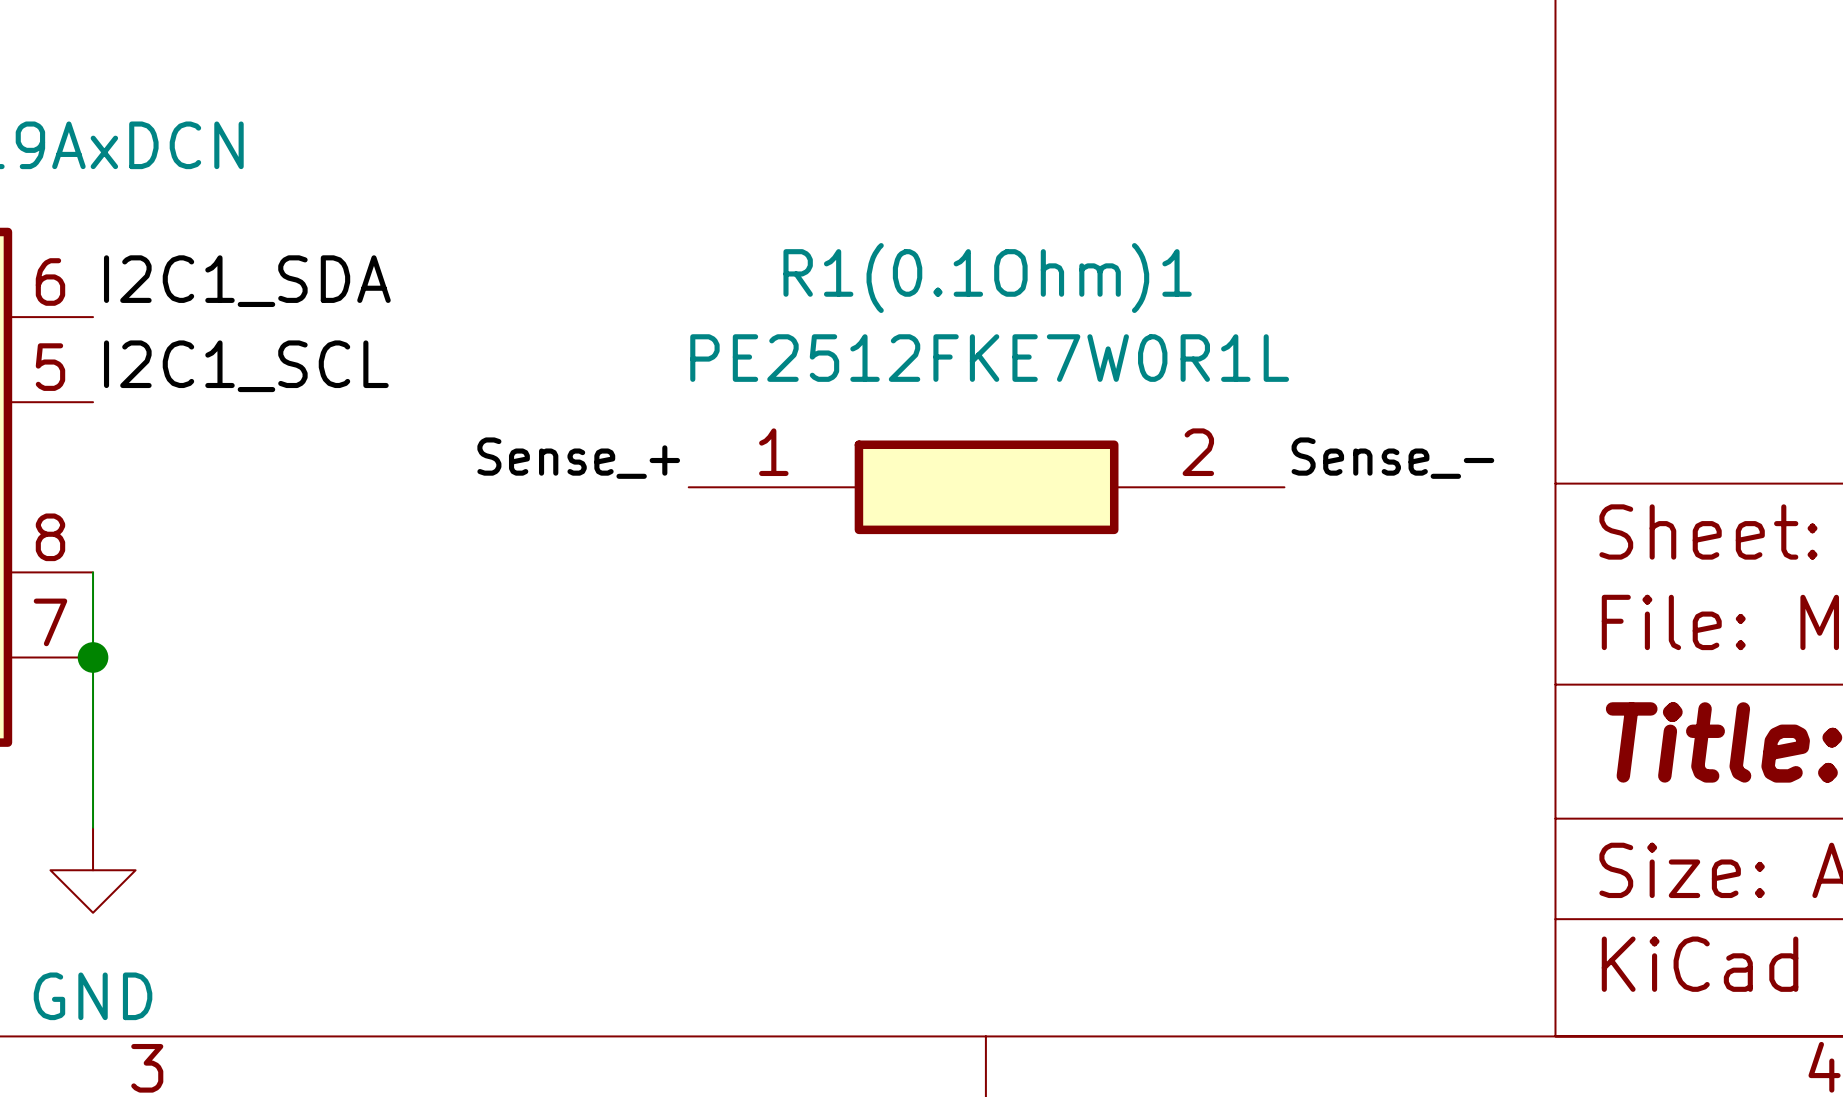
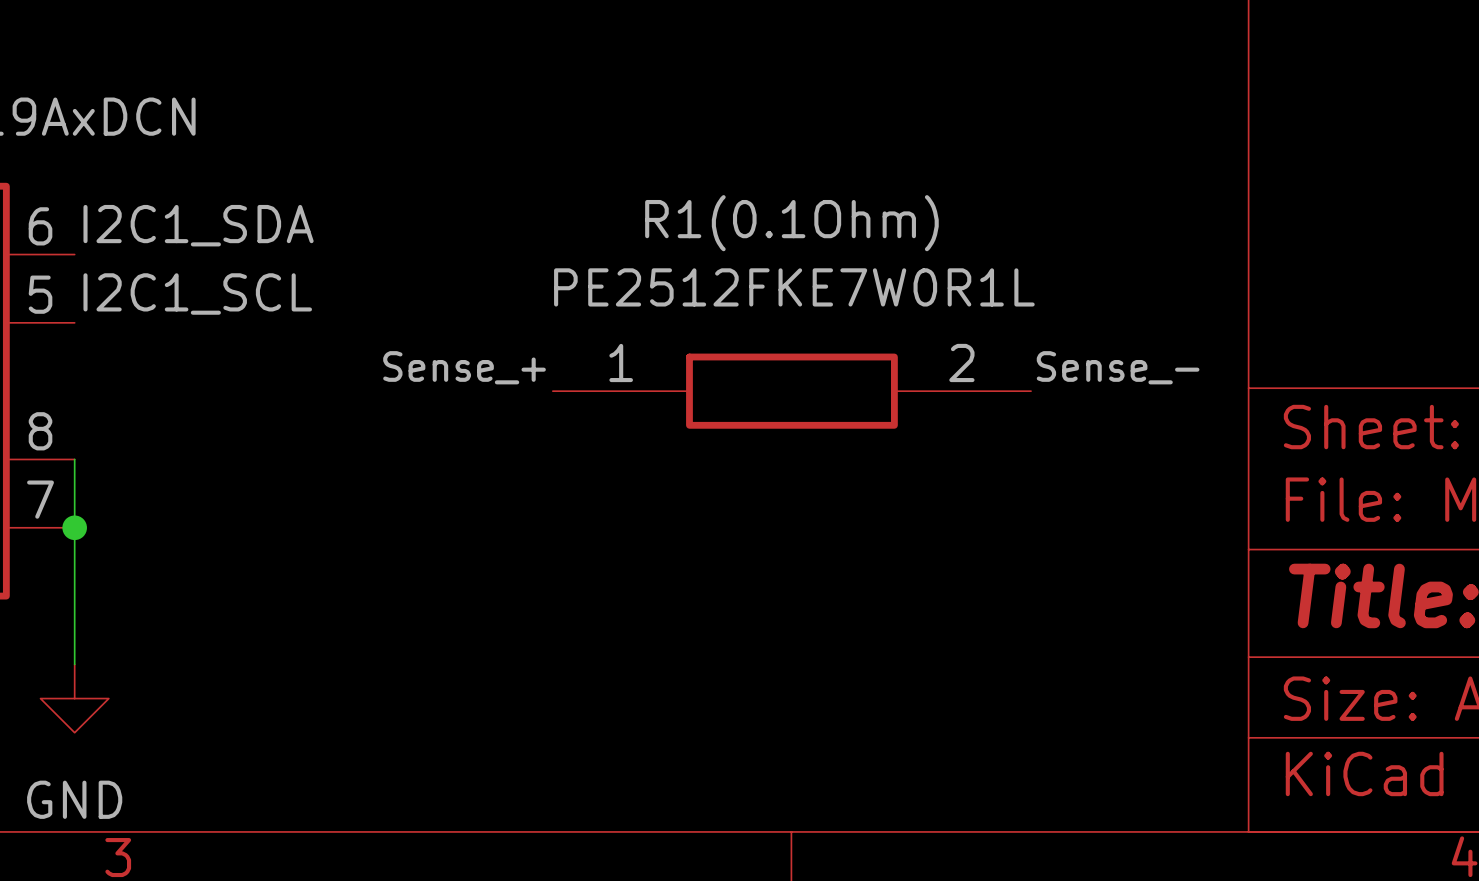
R1(0.1Ohm)1 name: R1(0.1Ohm)1 (987, 278) -> R1(0.1Ohm) (791, 223)

